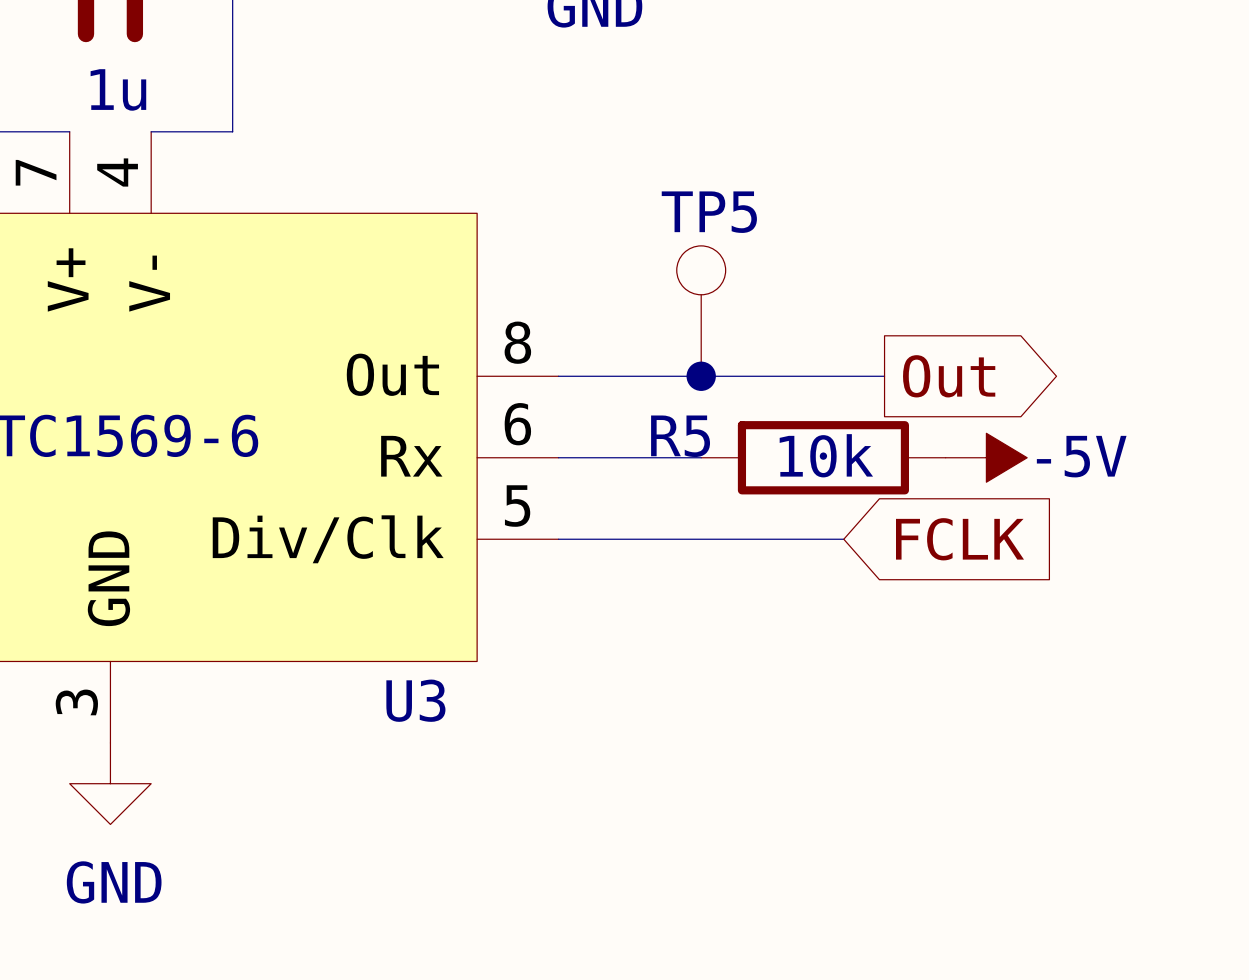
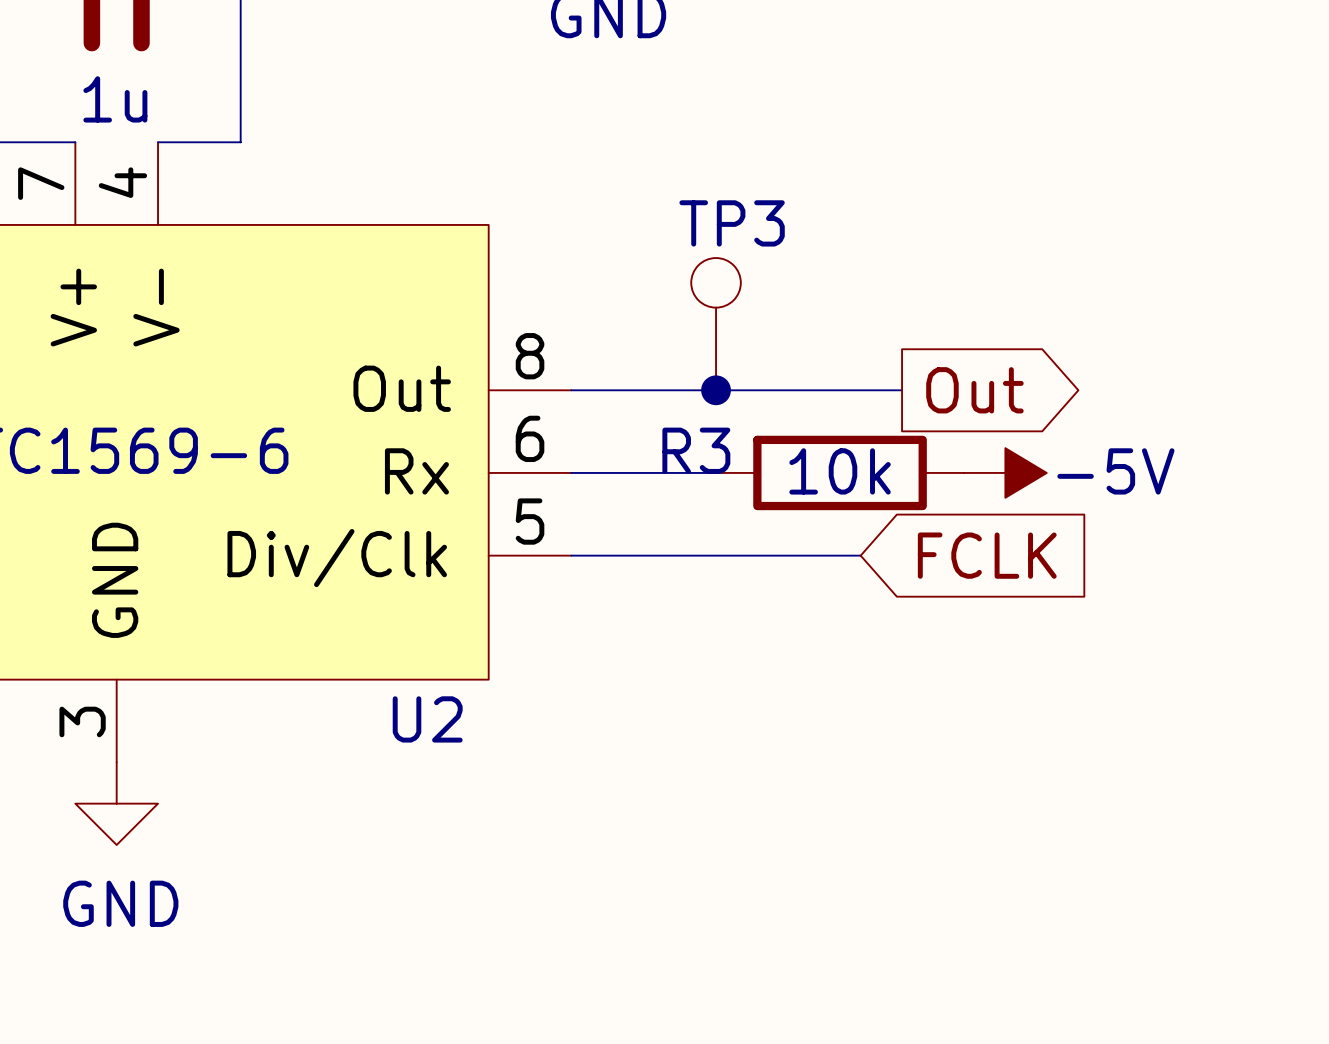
TP5 name: TP5 (709, 212) -> TP3 (732, 223)
R5 name: R5 (680, 436) -> R3 (696, 450)
U3 name: U3 (415, 700) -> U2 (427, 719)

